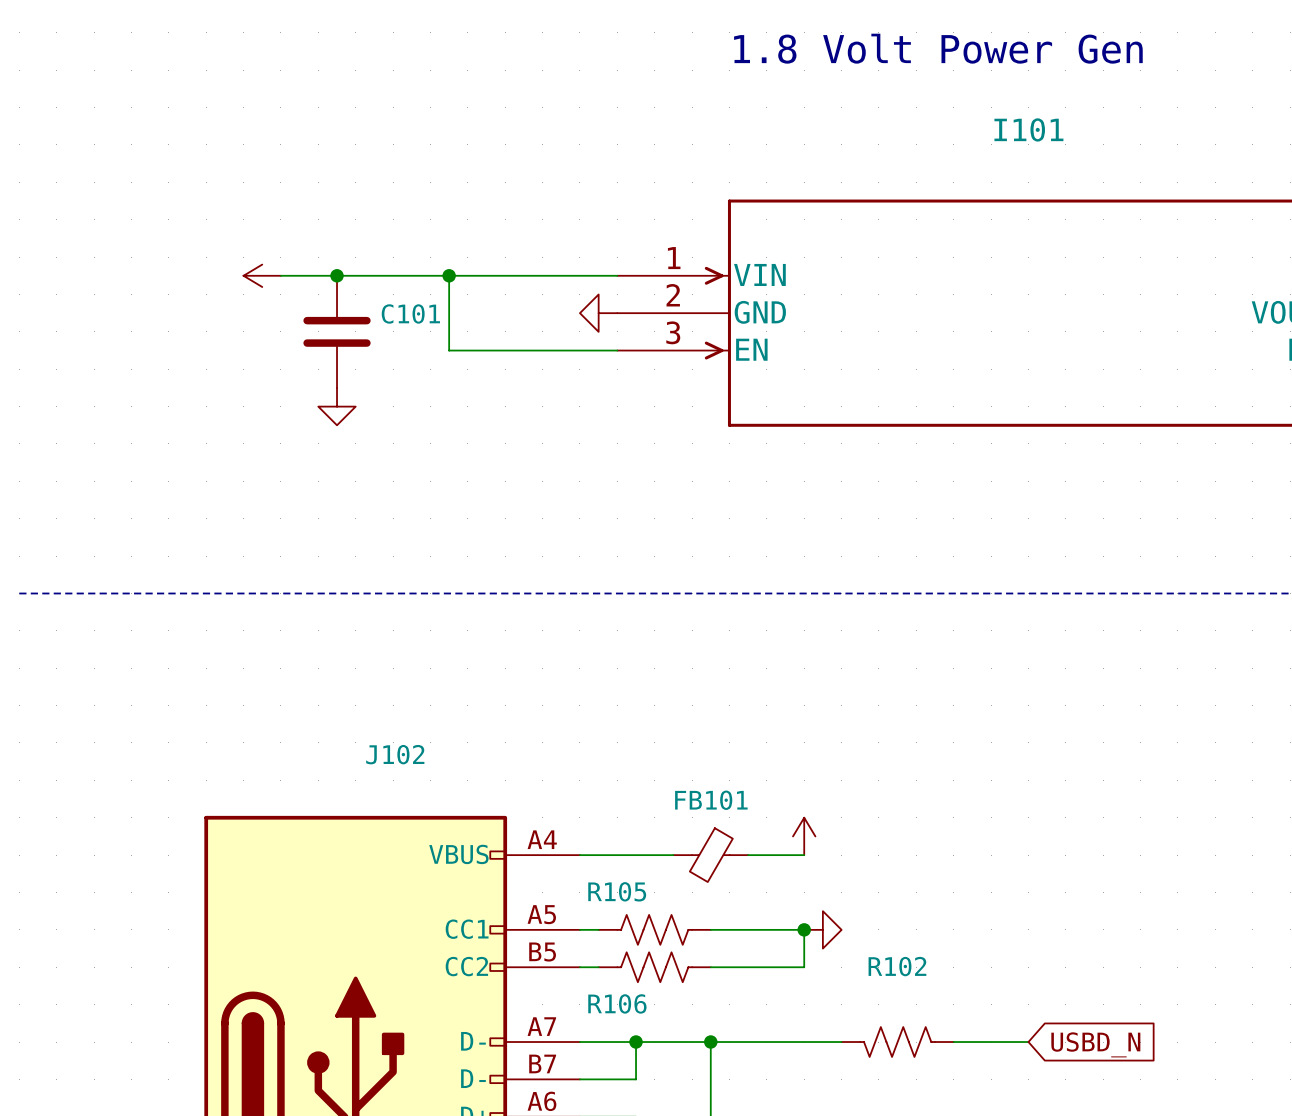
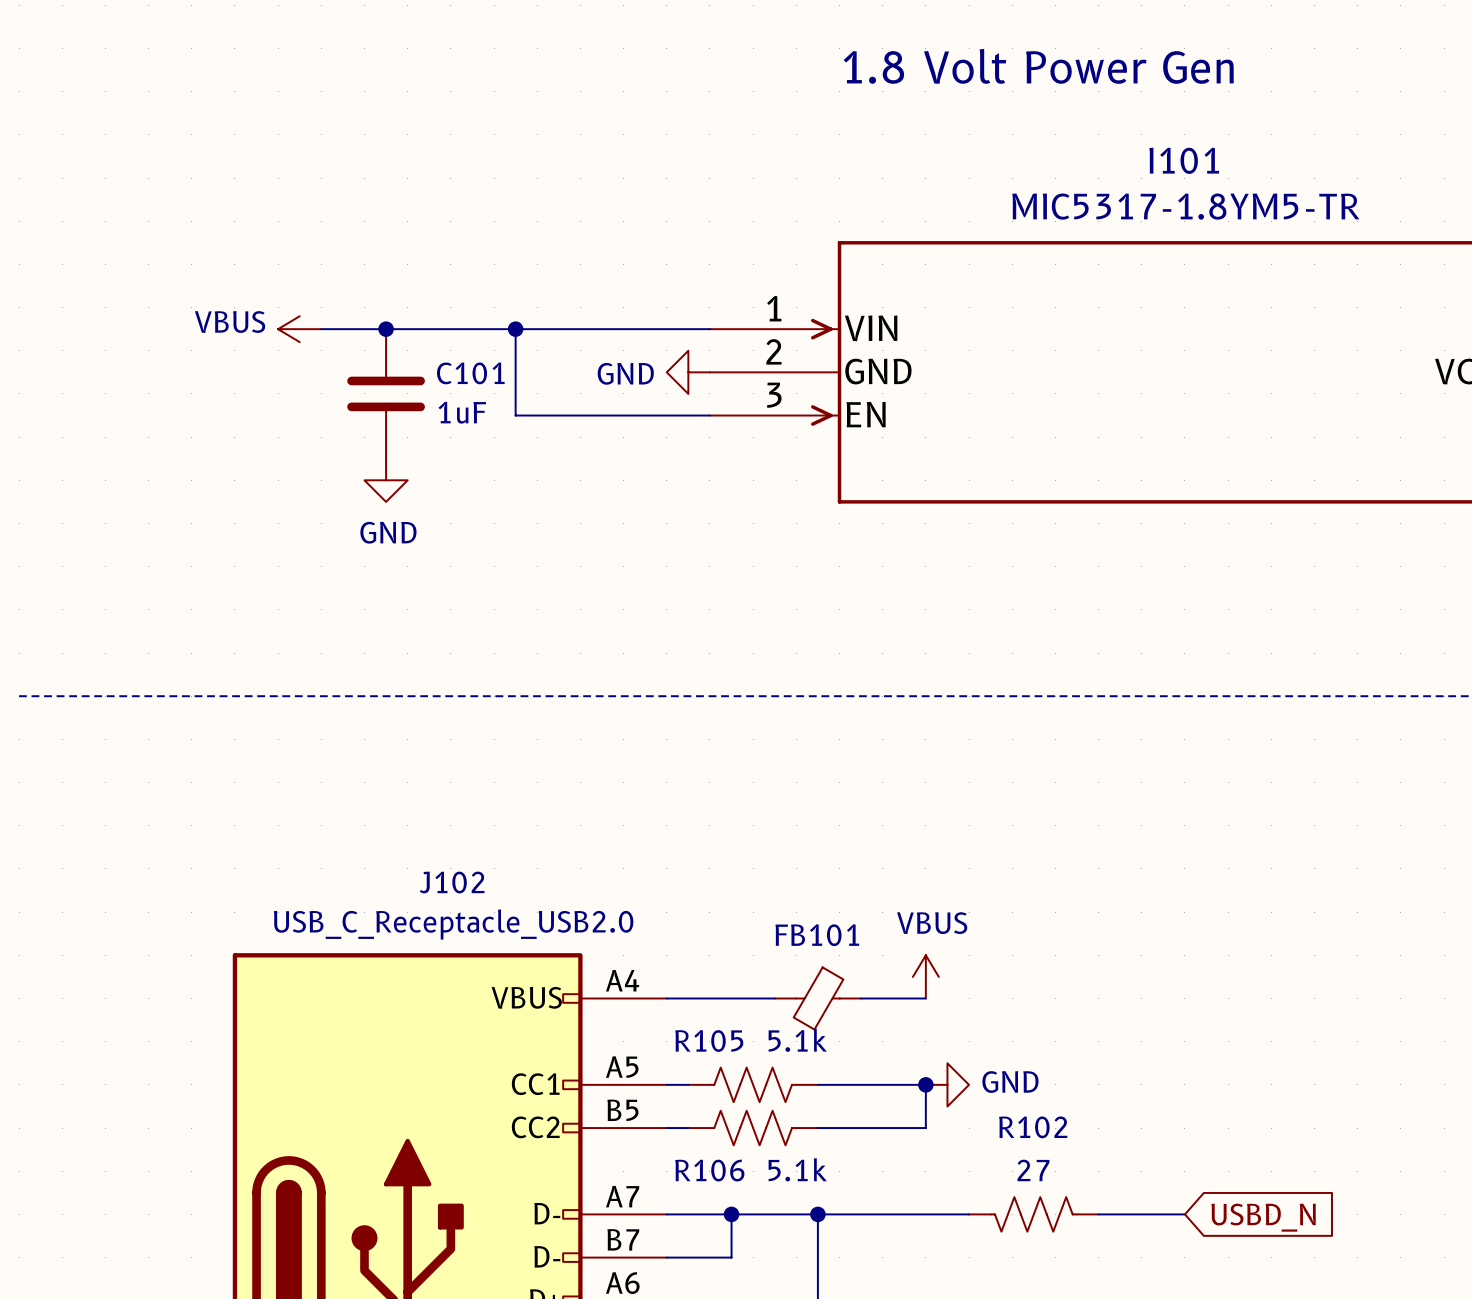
I101 value: none -> MIC5317-1.8YM5-TR (1185, 206)
power symbol text: none -> VBUS (230, 322)
power symbol text: none -> GND (625, 373)
C101 value: none -> 1uF (462, 412)
power symbol text: none -> GND (388, 532)
power symbol text: none -> VBUS (932, 923)
J102 value: none -> USB_C_Receptacle_USB2.0 (453, 924)
R105 value: none -> 5.1k (797, 1040)
power symbol text: none -> GND (1010, 1082)
R106 value: none -> 5.1k (797, 1169)
R102 value: none -> 27 (1033, 1170)

